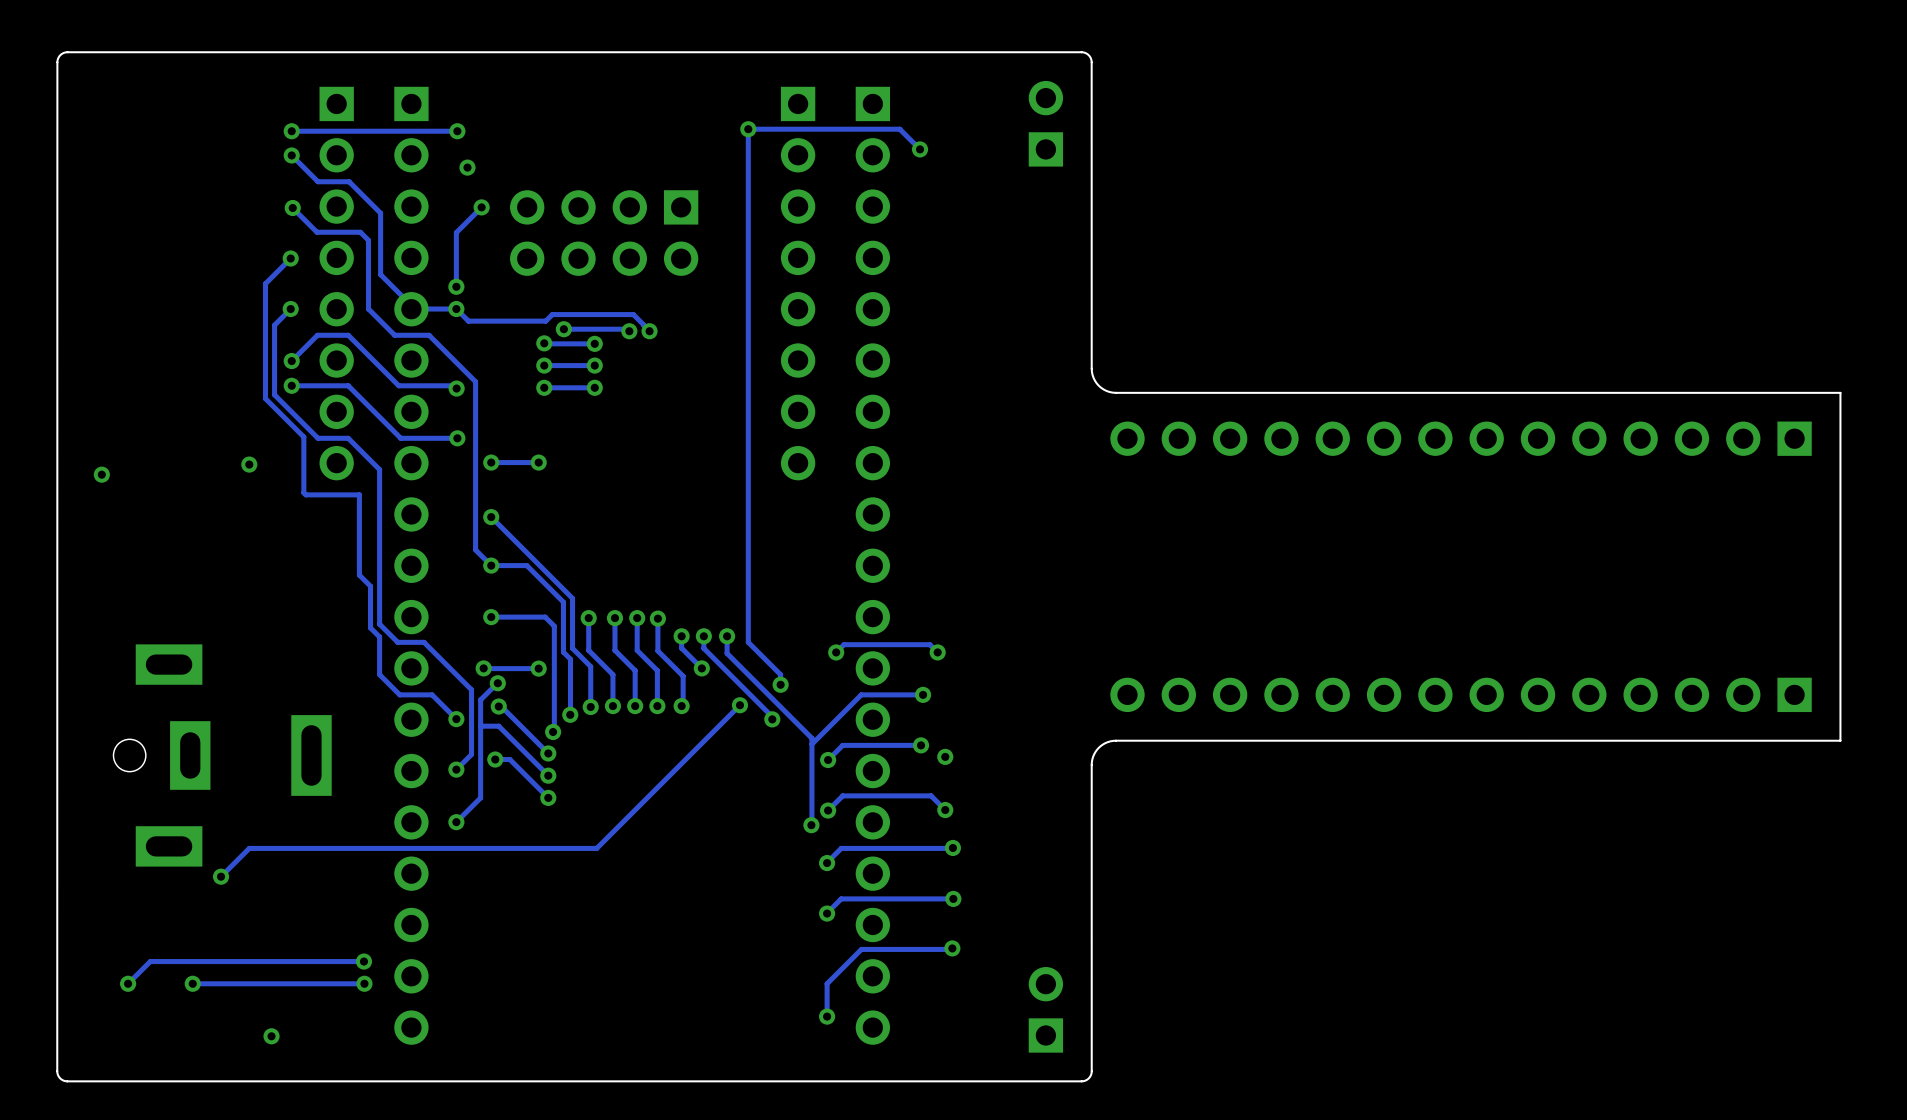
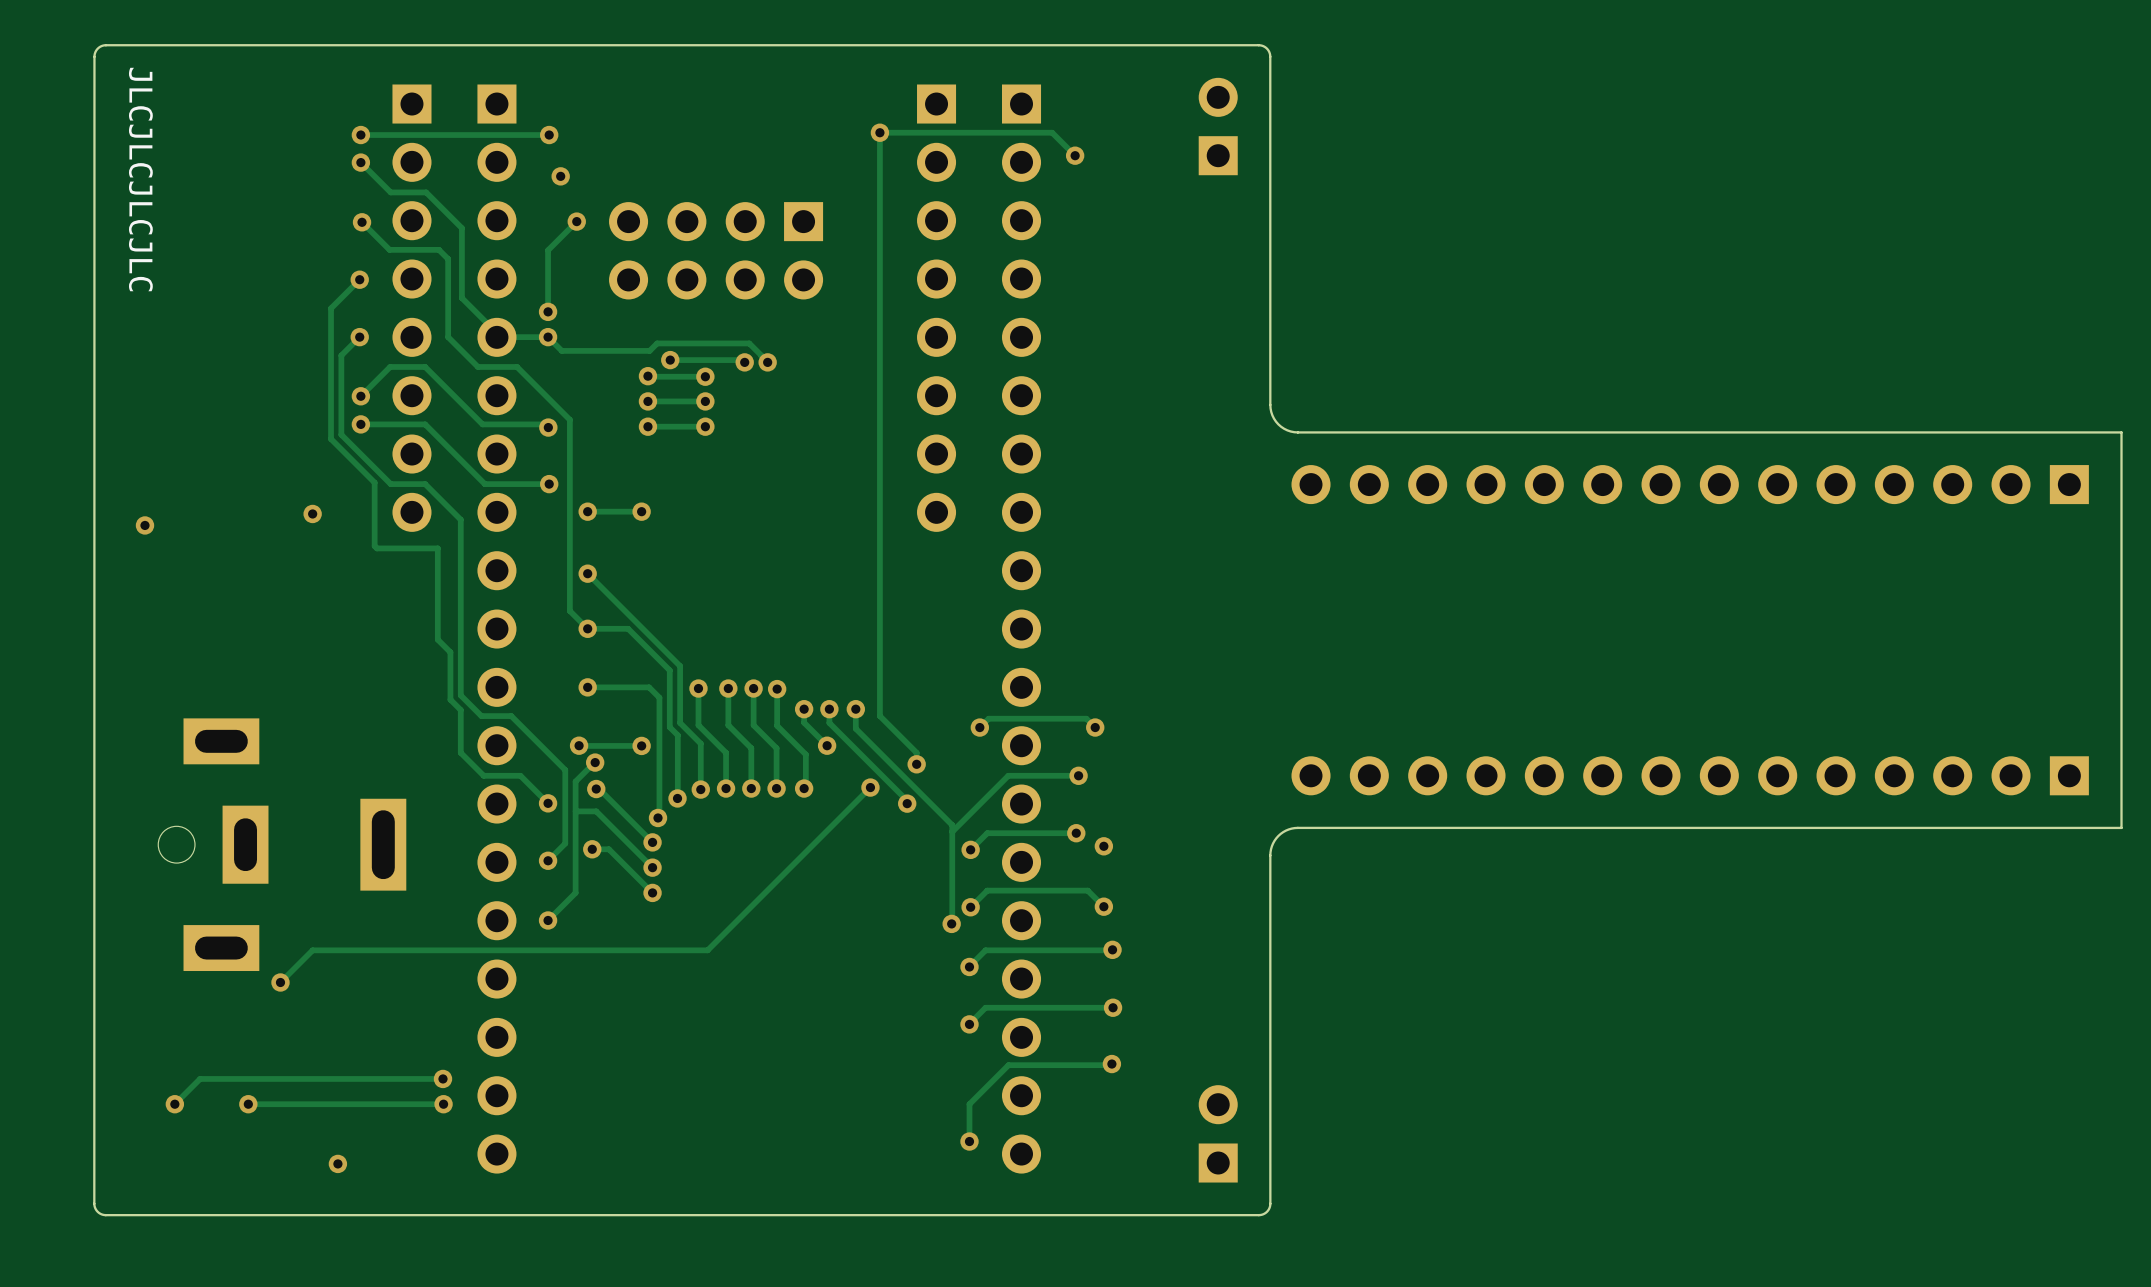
text: none -> JLCJLCJLCJLC (140, 179)

